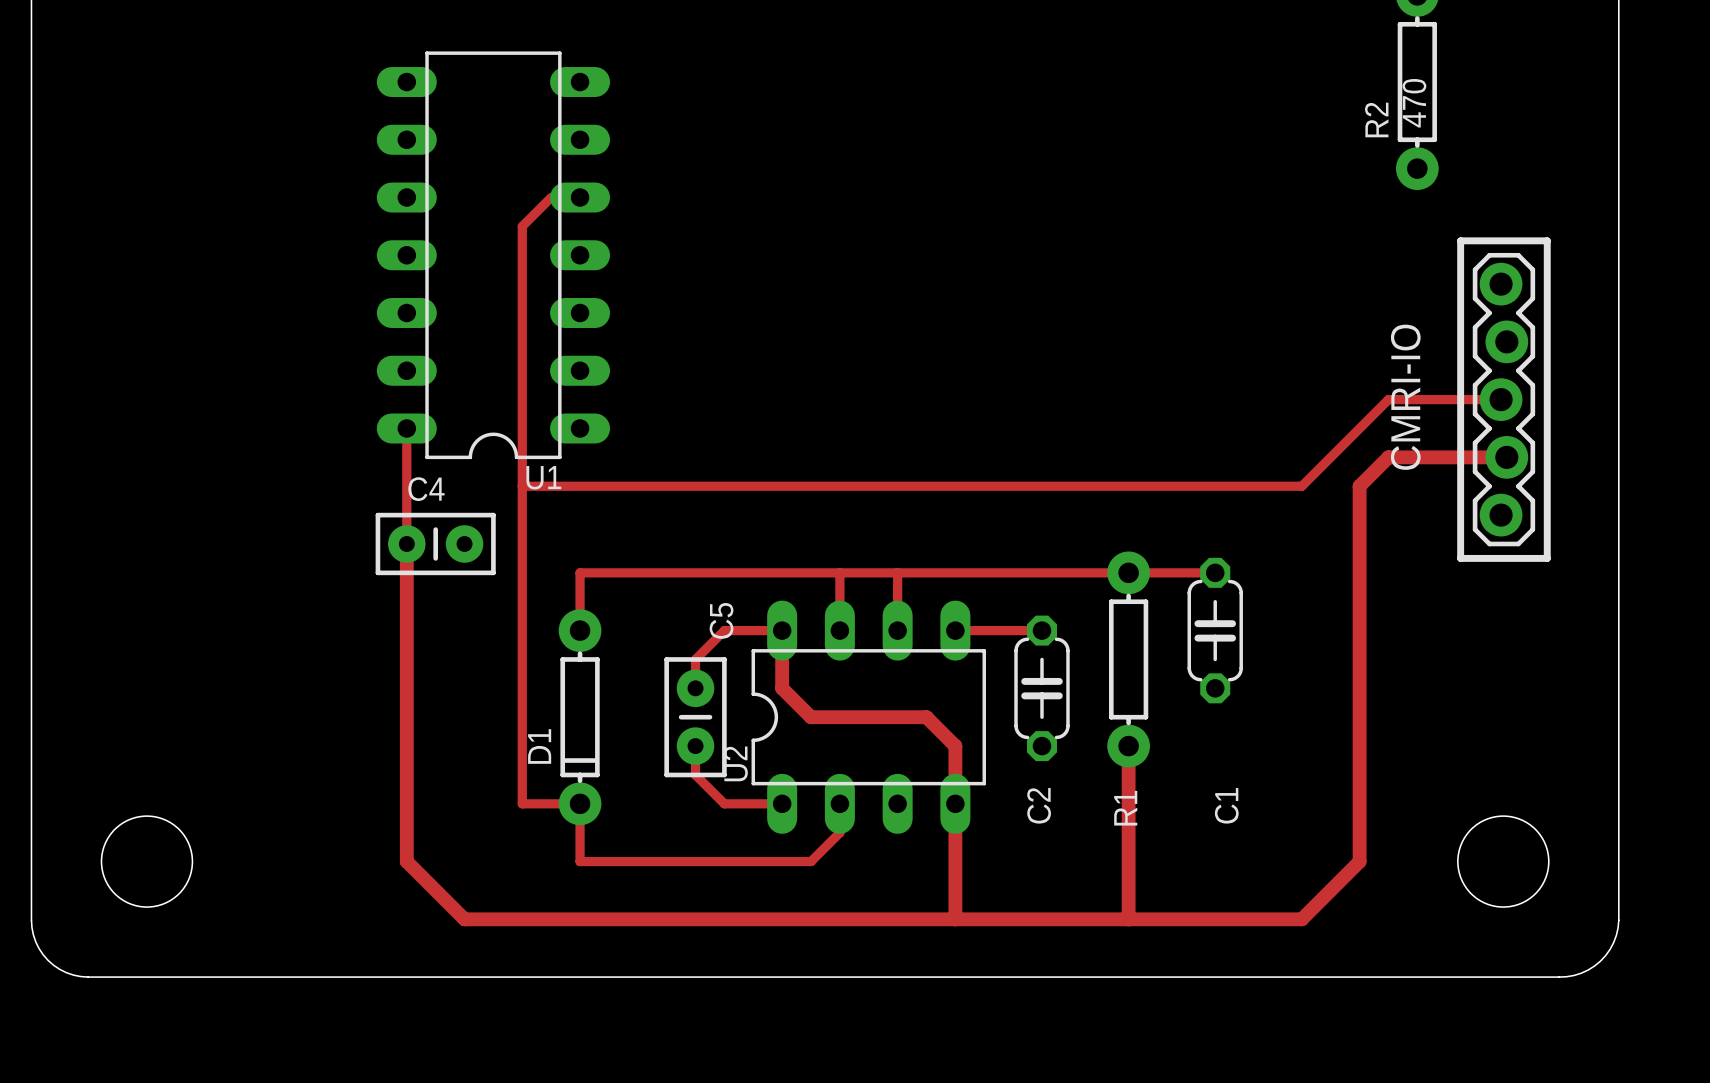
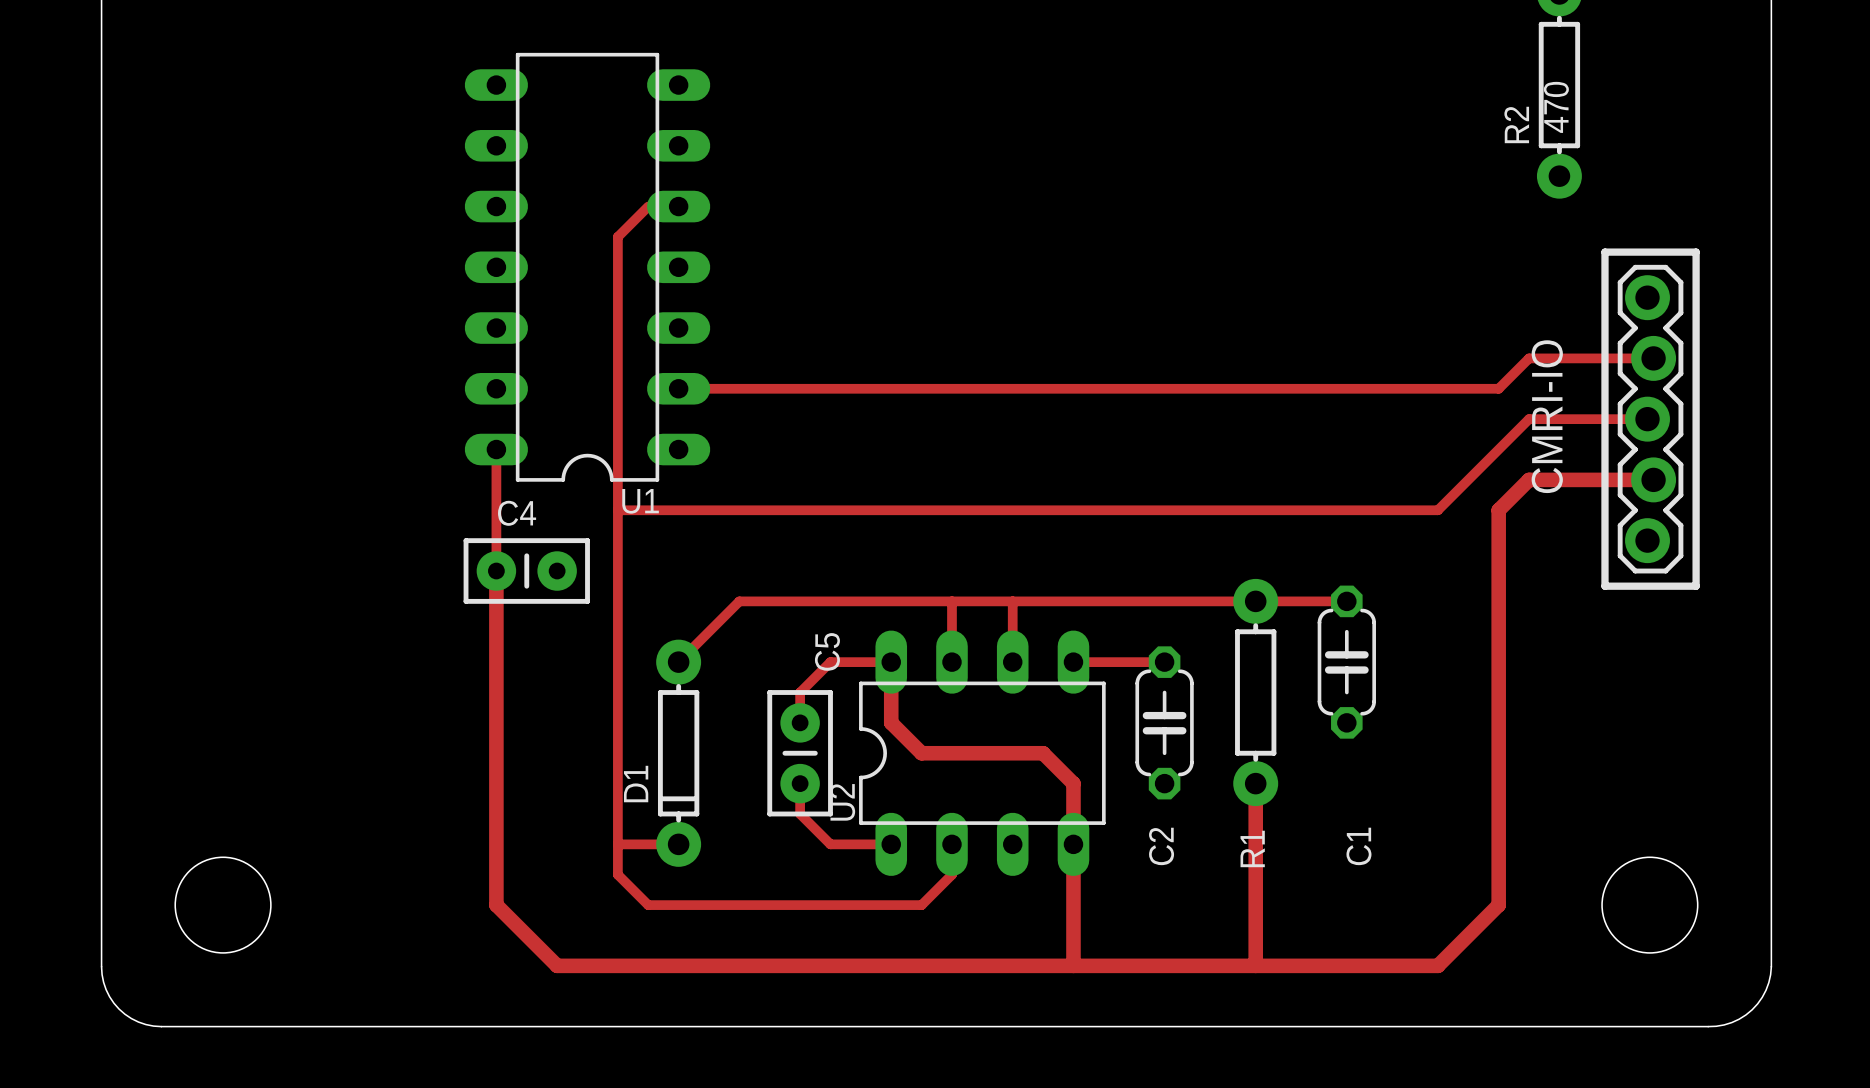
track: none -> (1653, 358) (1529, 358) (1498, 388) (678, 388)
track: (637, 572) (580, 572) (580, 630) -> (739, 601) (678, 662)
track: (580, 803) (580, 861) -> (617, 844) (617, 874) (648, 905) (678, 905)

